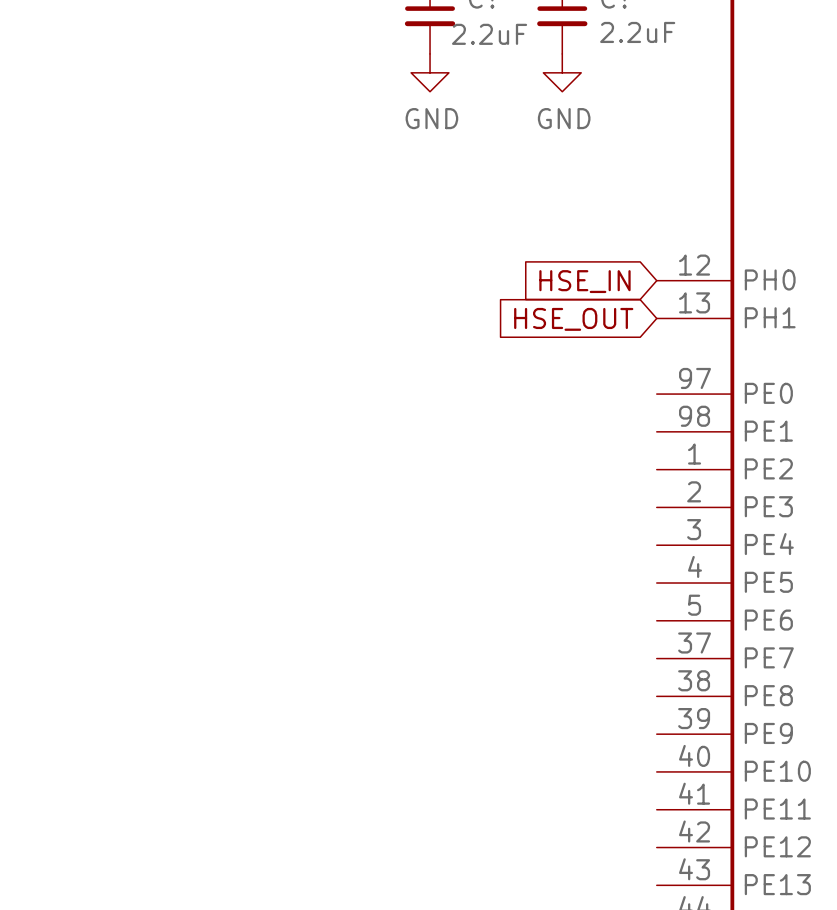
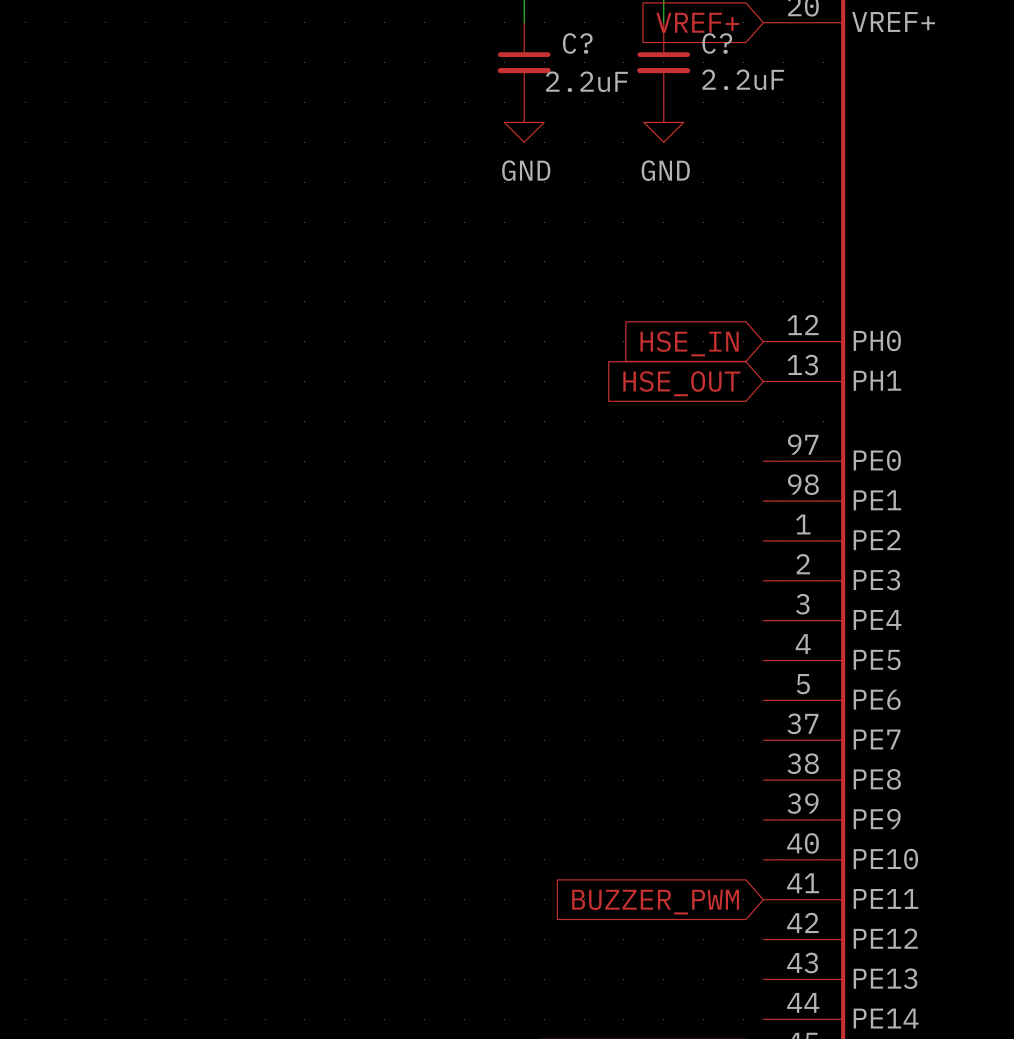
global label: none -> BUZZER_PWM (655, 902)

